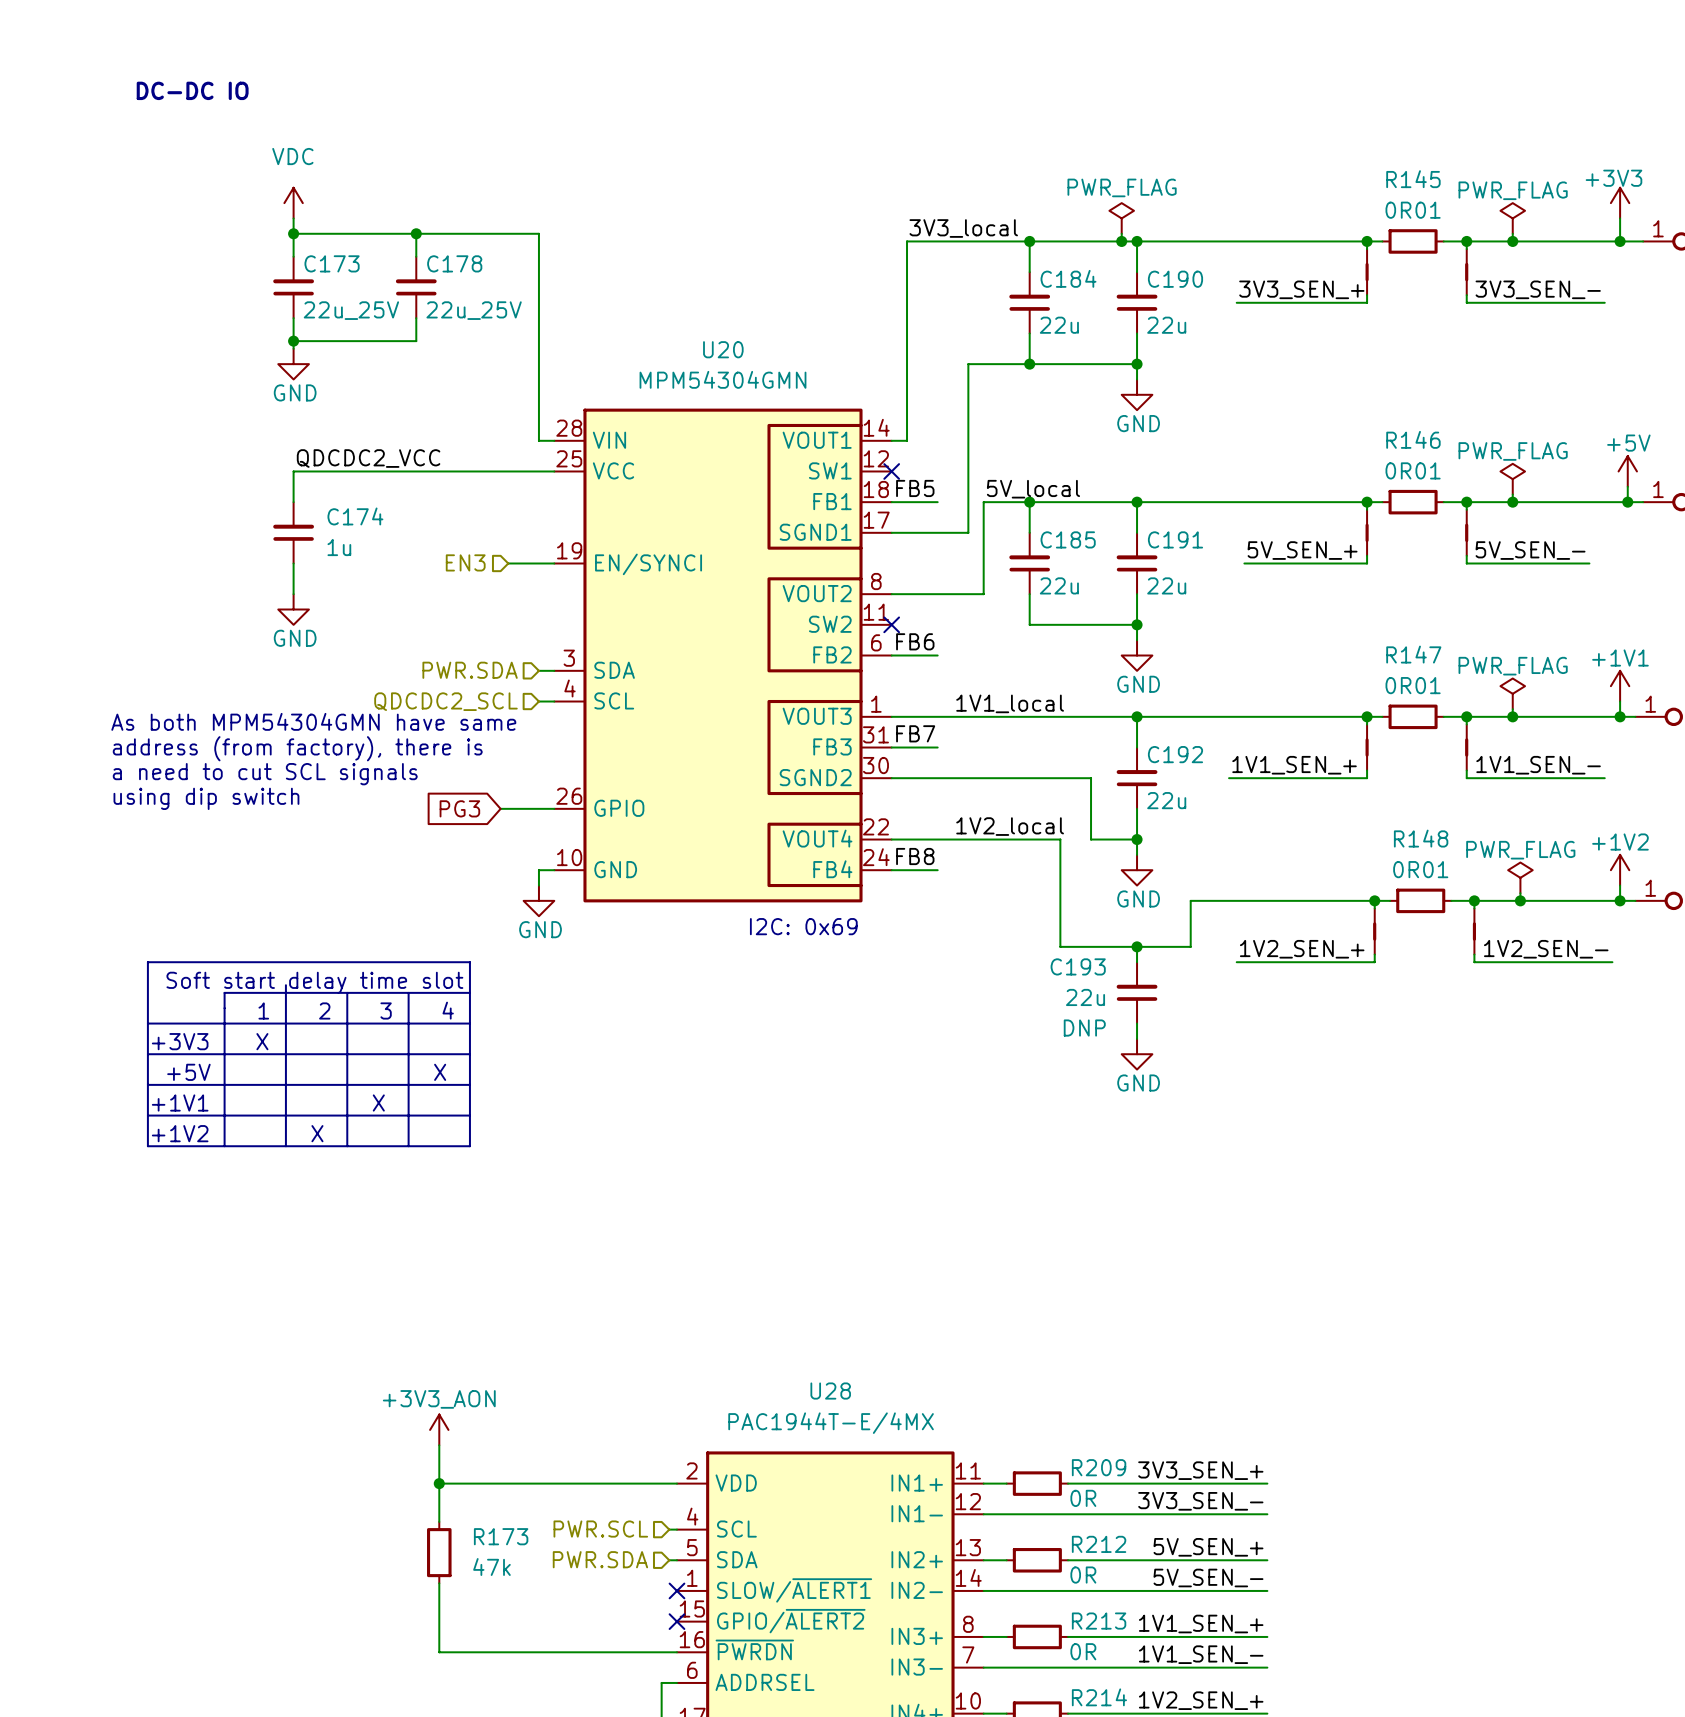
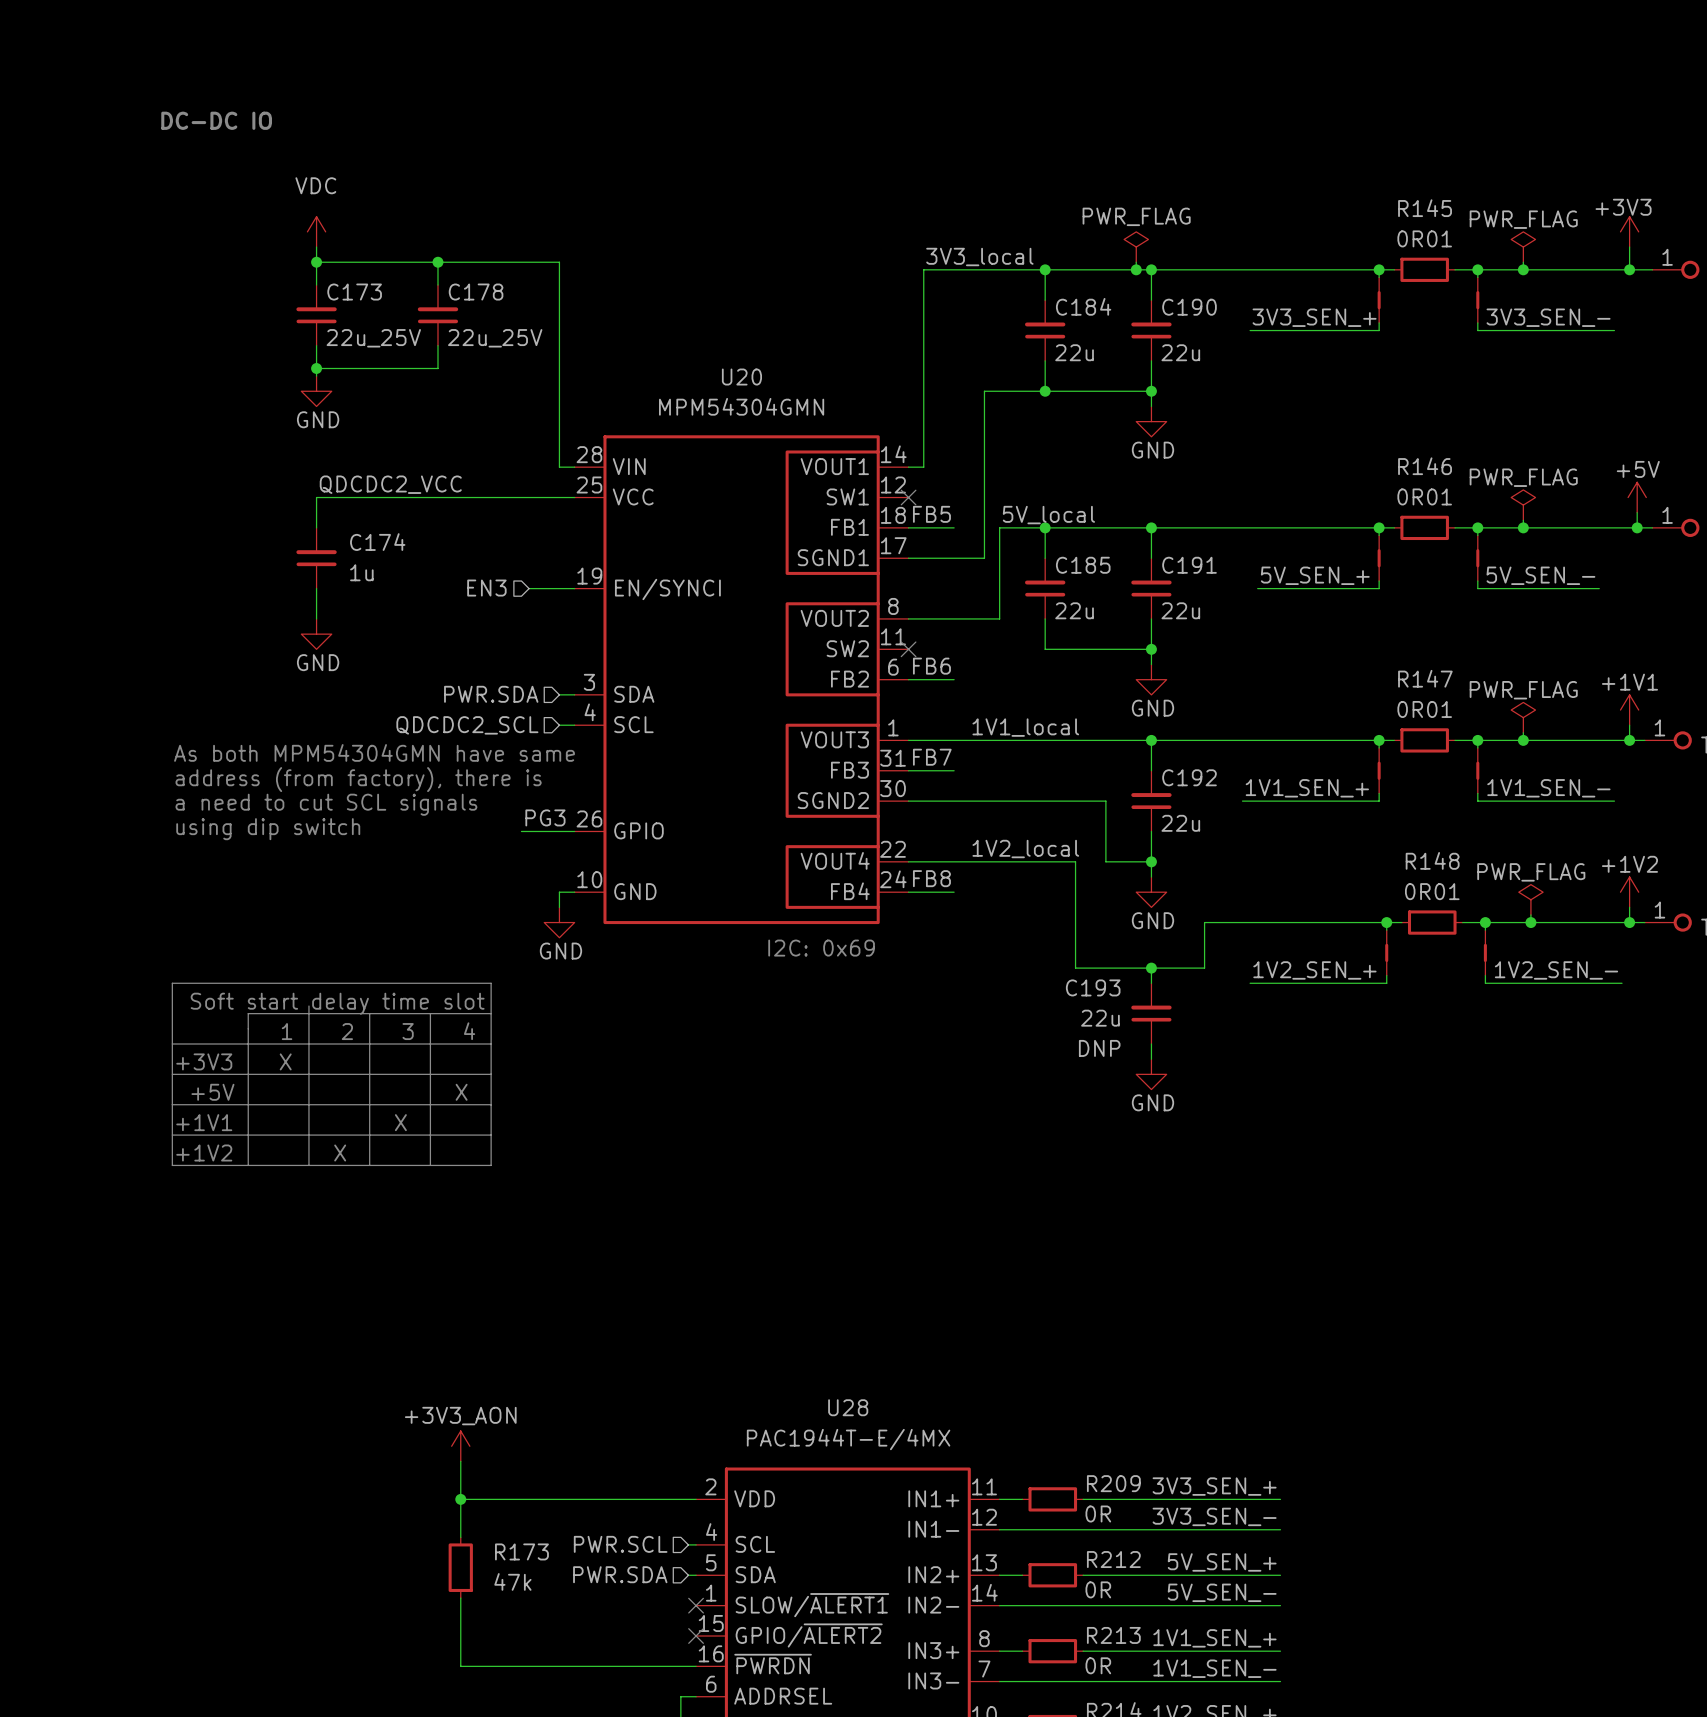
text position: As both MPM54304GMN have same (313, 721) -> As both MPM54304GMN have same (374, 752)
text position: address (from factory), there is (297, 748) -> address (from factory), there is (358, 779)
text position: a need to cut SCL signals (265, 774) -> a need to cut SCL signals (326, 804)
label: none -> PG3 (545, 817)
text position: using dip switch (206, 798) -> using dip switch (268, 829)
global label: PG3 (459, 808) -> none

